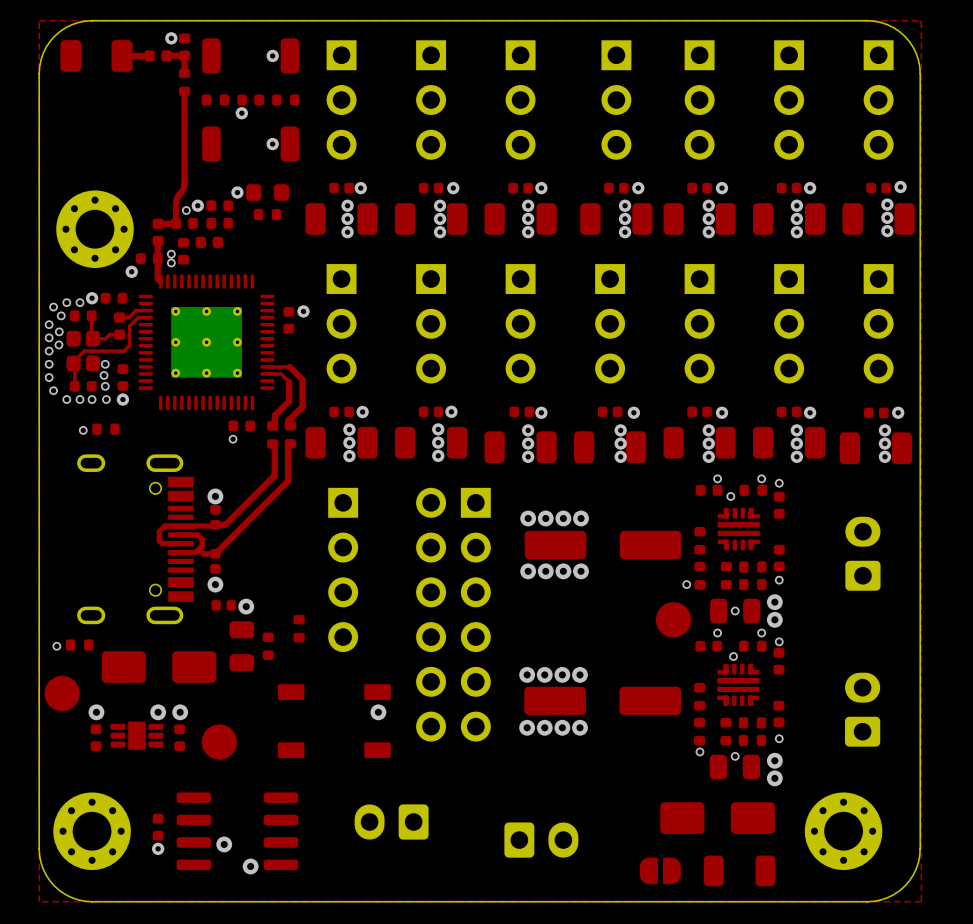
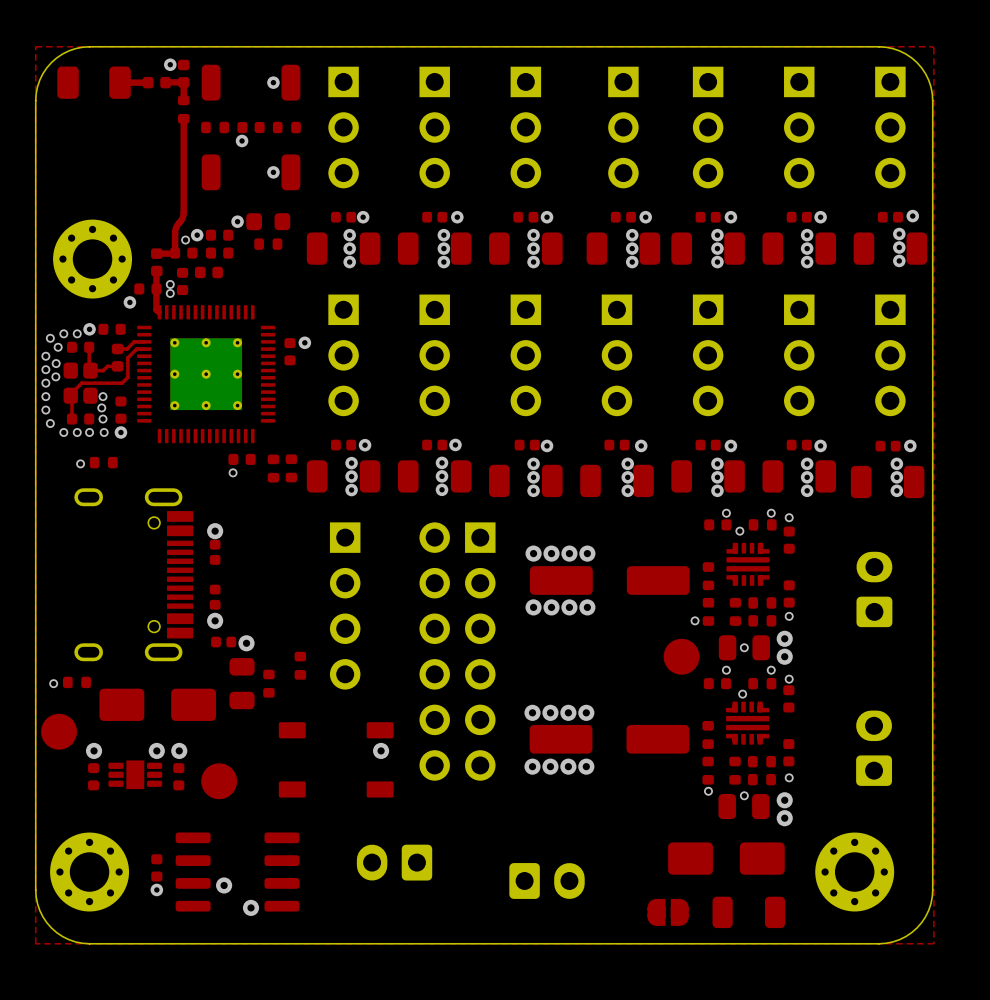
top track: (267, 366) (289, 366) (302, 379) (302, 406) (288, 421) (290, 425) -> none
top track: (267, 374) (281, 374) (289, 381) (289, 401) (274, 415) (274, 423) (272, 425) -> none
top track: (272, 443) (274, 445) (274, 475) (225, 524) (164, 526) (159, 531) (159, 540) (162, 543) (180, 543) -> none
top track: (290, 443) (288, 445) (288, 481) (215, 553) (203, 553) (198, 549) -> none
top track: (180, 534) (197, 534) (202, 539) (202, 546) (195, 552) (180, 552) -> none

